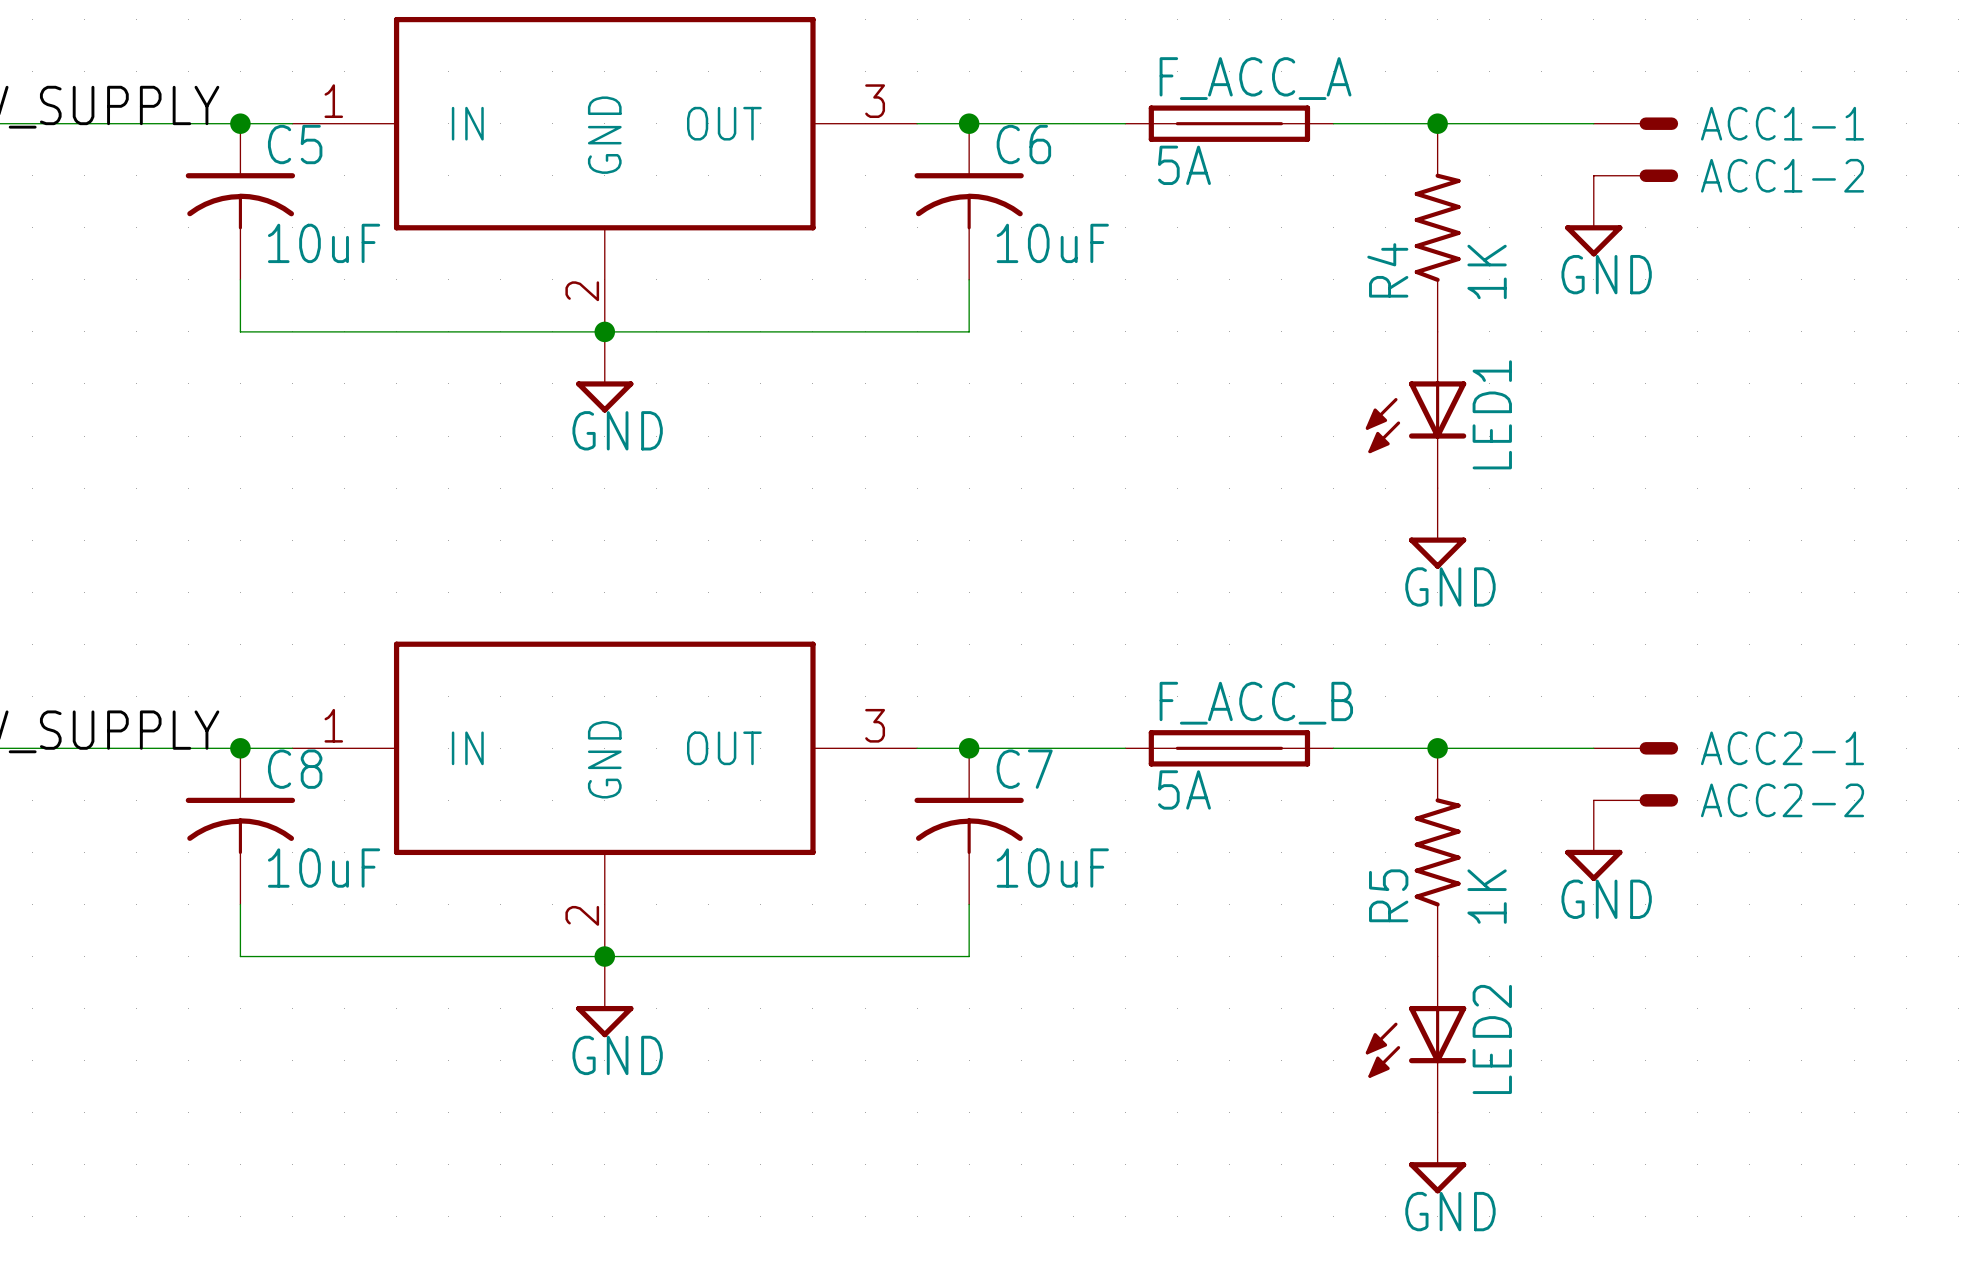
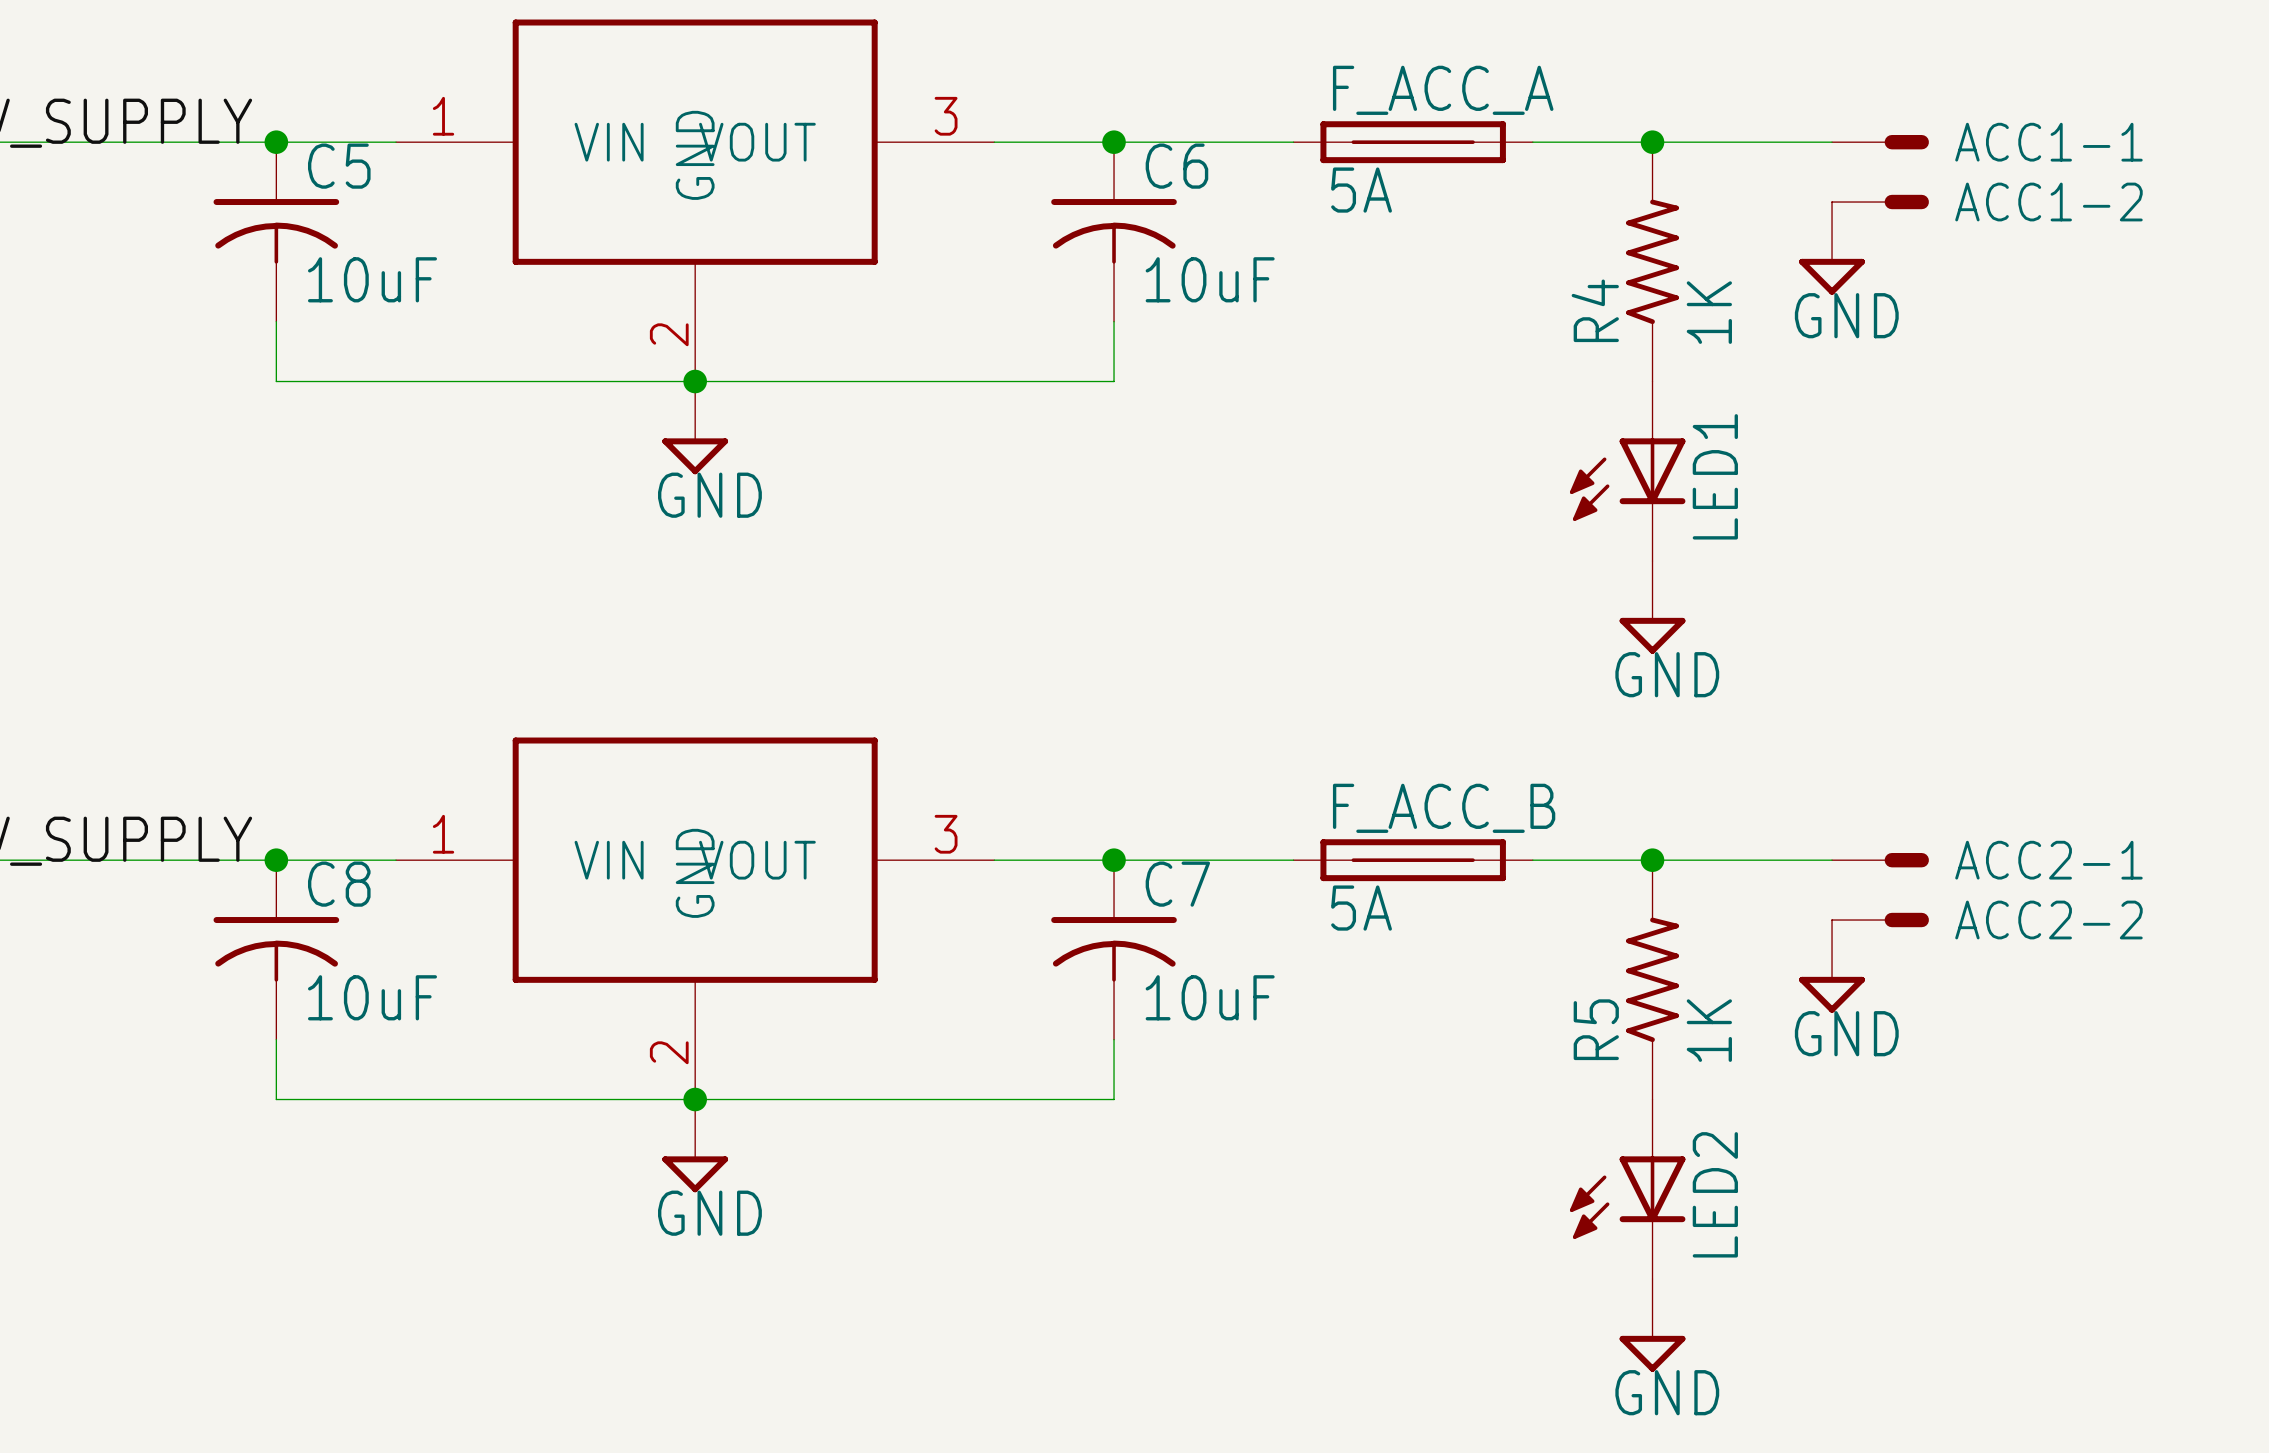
part symbol: [292, 16, 918, 332] -> [396, 19, 995, 382]
part symbol: [292, 641, 918, 957] -> [396, 737, 995, 1100]

